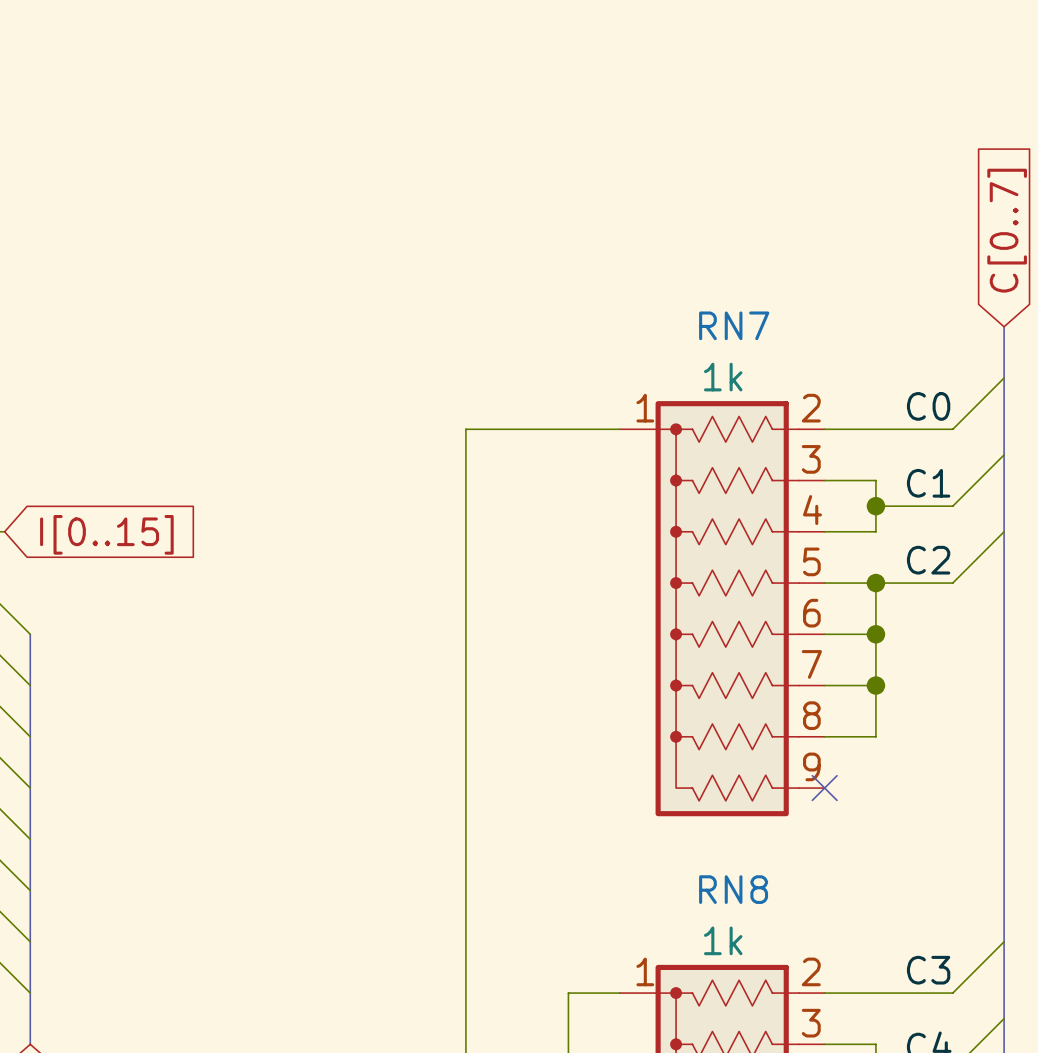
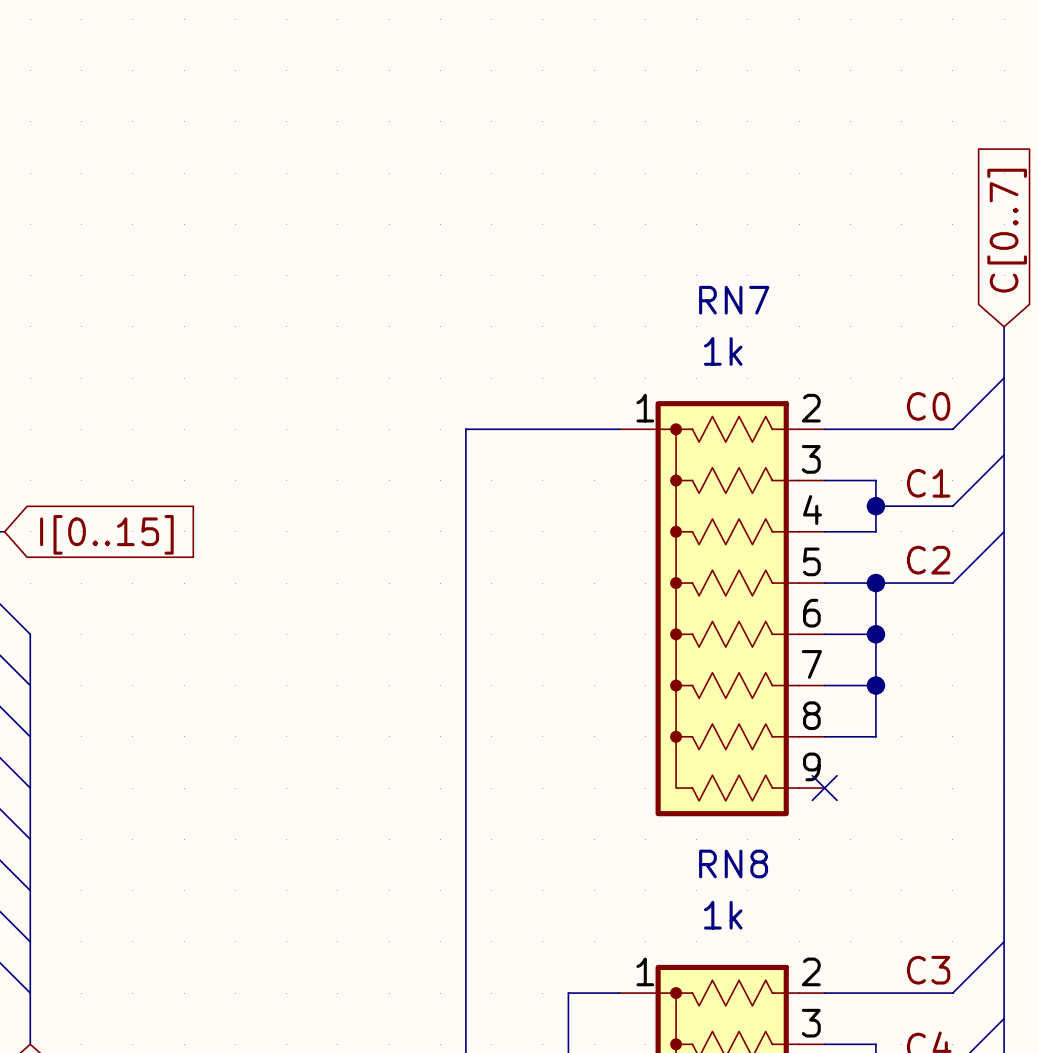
RN7 name position: RN7 (734, 325) -> RN7 (734, 300)
RN7 value position: 1k (723, 377) -> 1k (723, 351)
RN8 name position: RN8 (733, 889) -> RN8 (733, 863)
RN8 value position: 1k (723, 940) -> 1k (723, 915)

